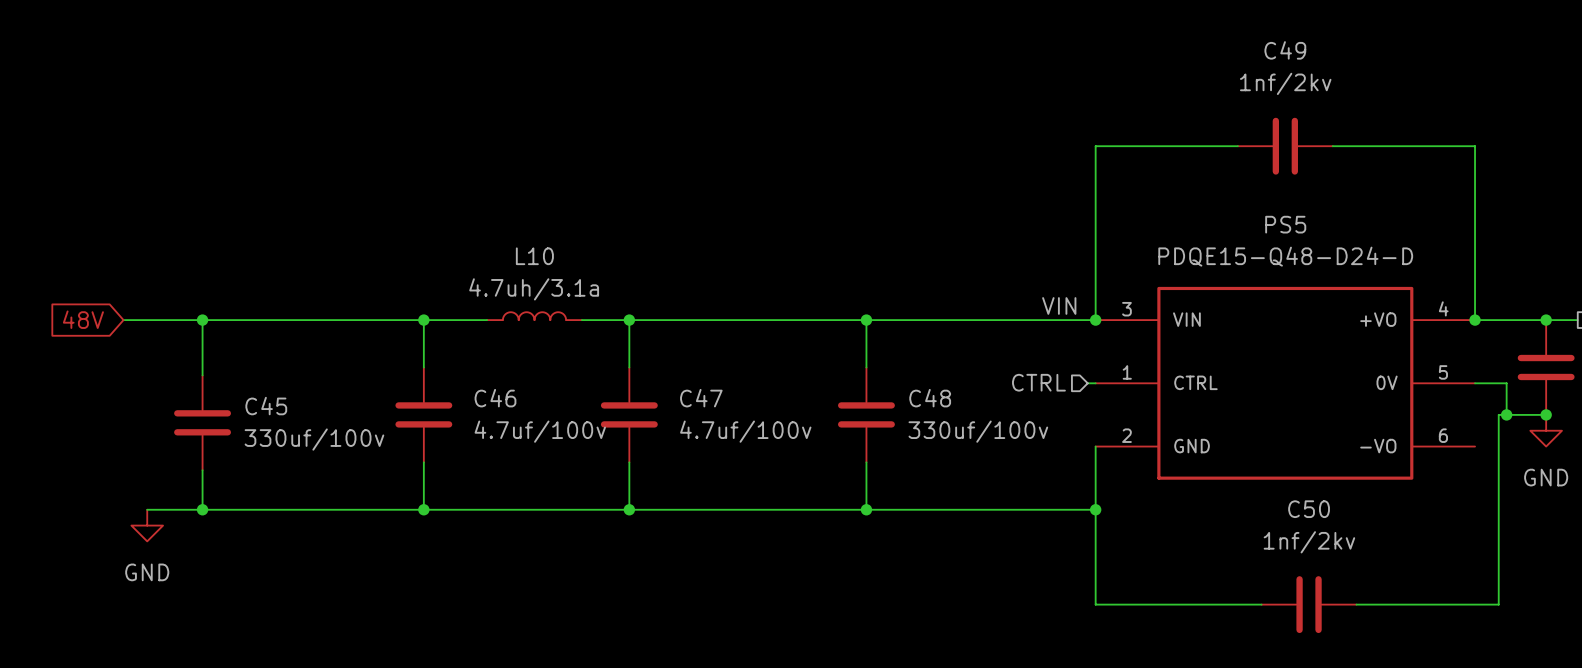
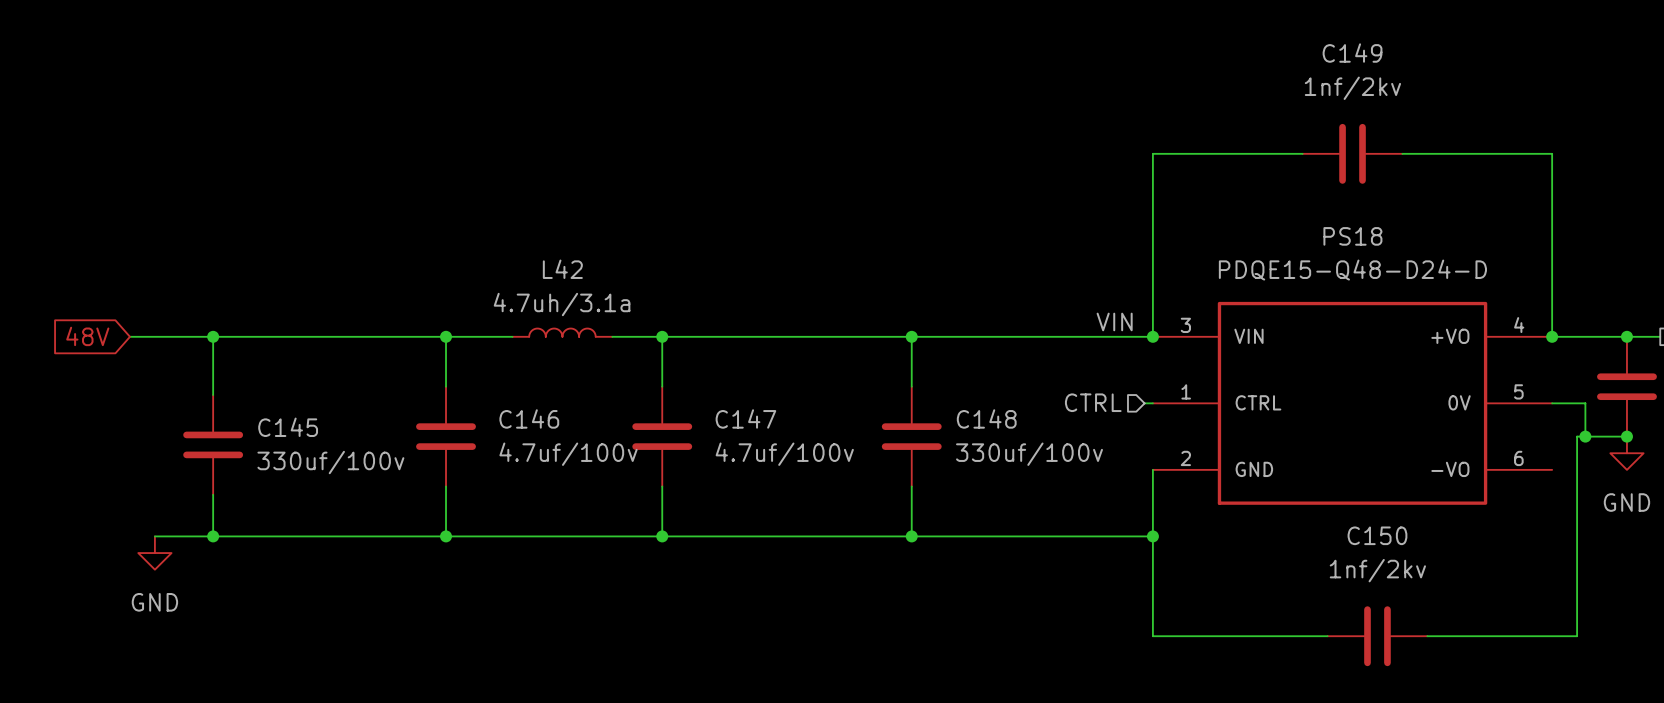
C49 name: C49 (1285, 50) -> C149 (1352, 53)
PS5 name: PS5 (1285, 224) -> PS18 (1352, 236)
L10 name: L10 (534, 256) -> L42 (562, 269)
C46 name: C46 (495, 398) -> C146 (529, 418)
C47 name: C47 (701, 398) -> C147 (745, 418)
C48 name: C48 (930, 398) -> C148 (986, 418)
C45 name: C45 (266, 406) -> C145 (288, 427)
C50 name: C50 (1309, 509) -> C150 (1377, 535)

